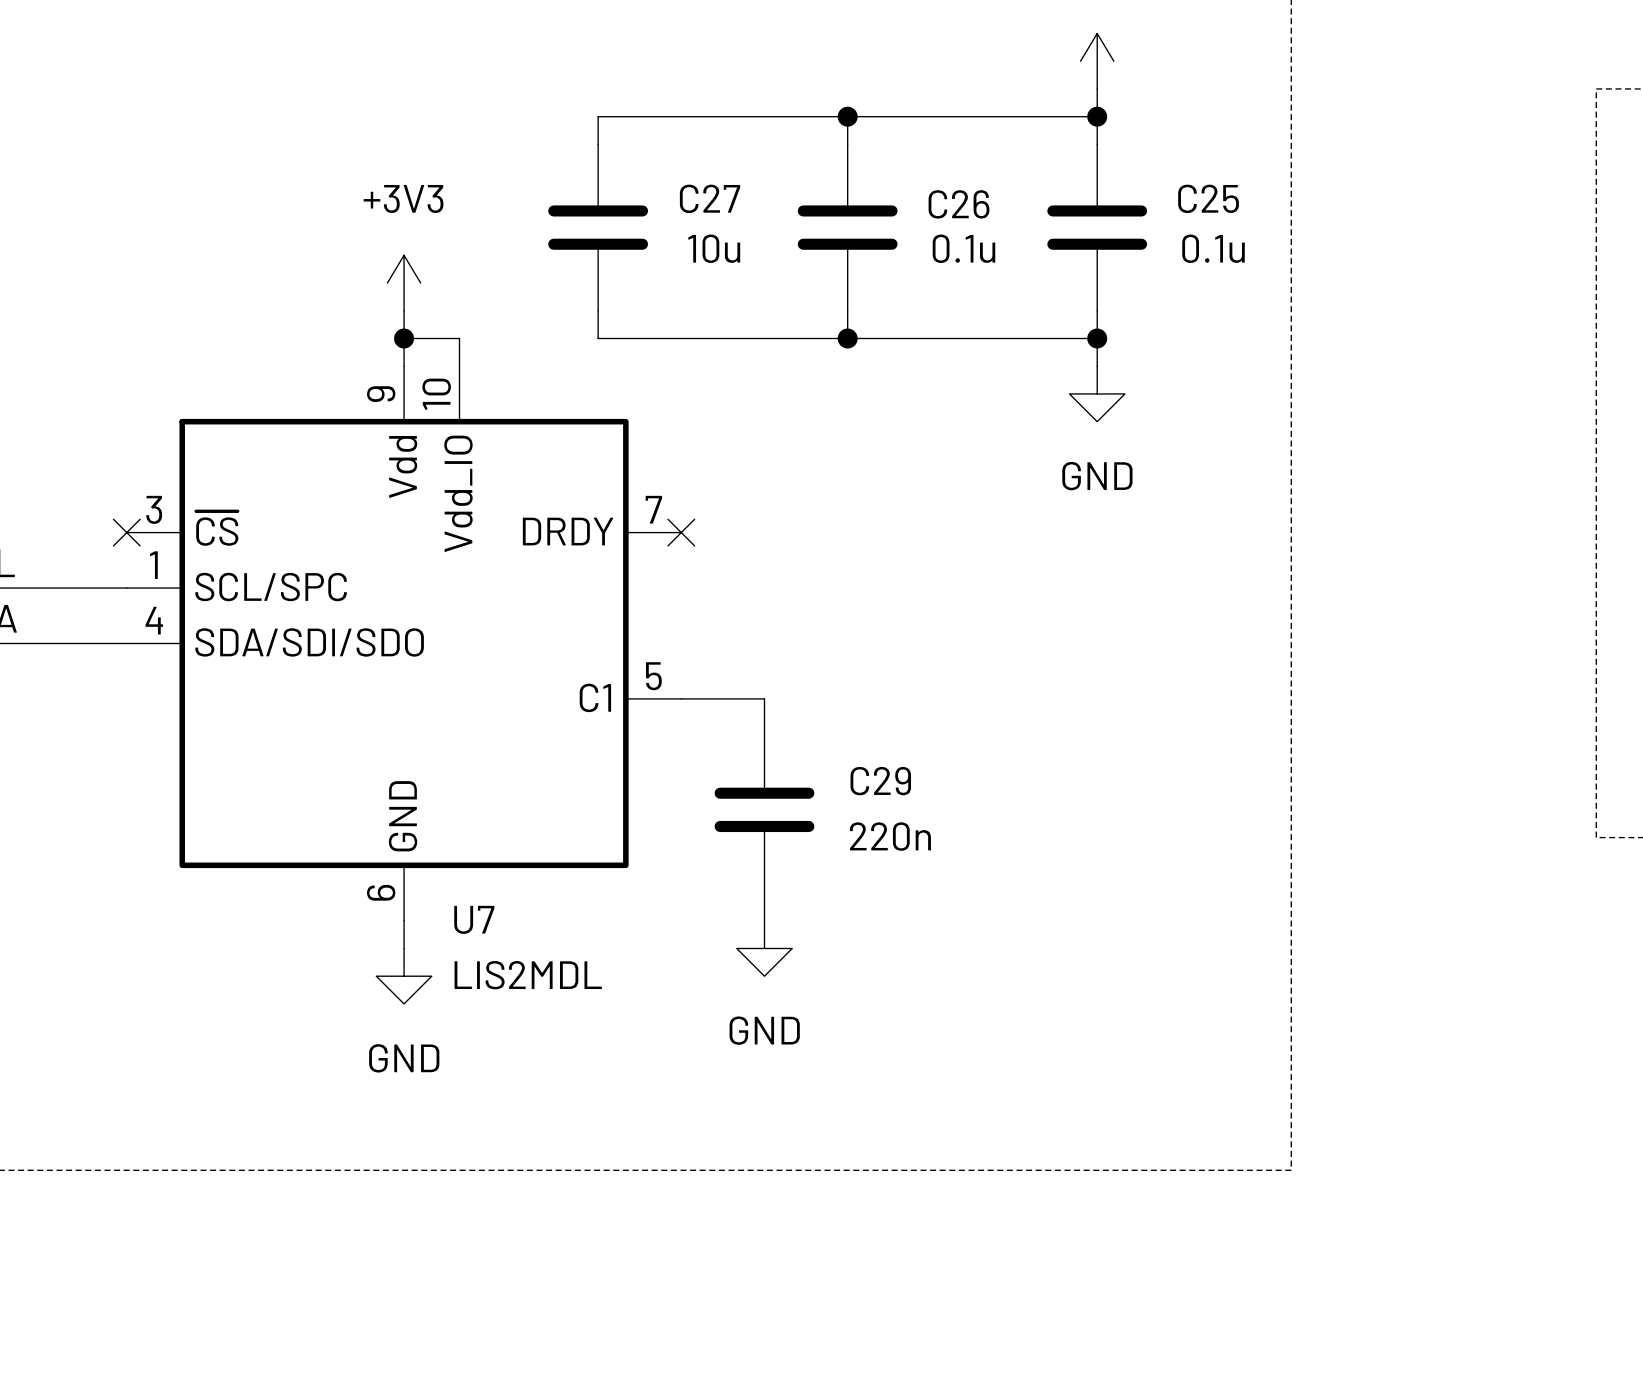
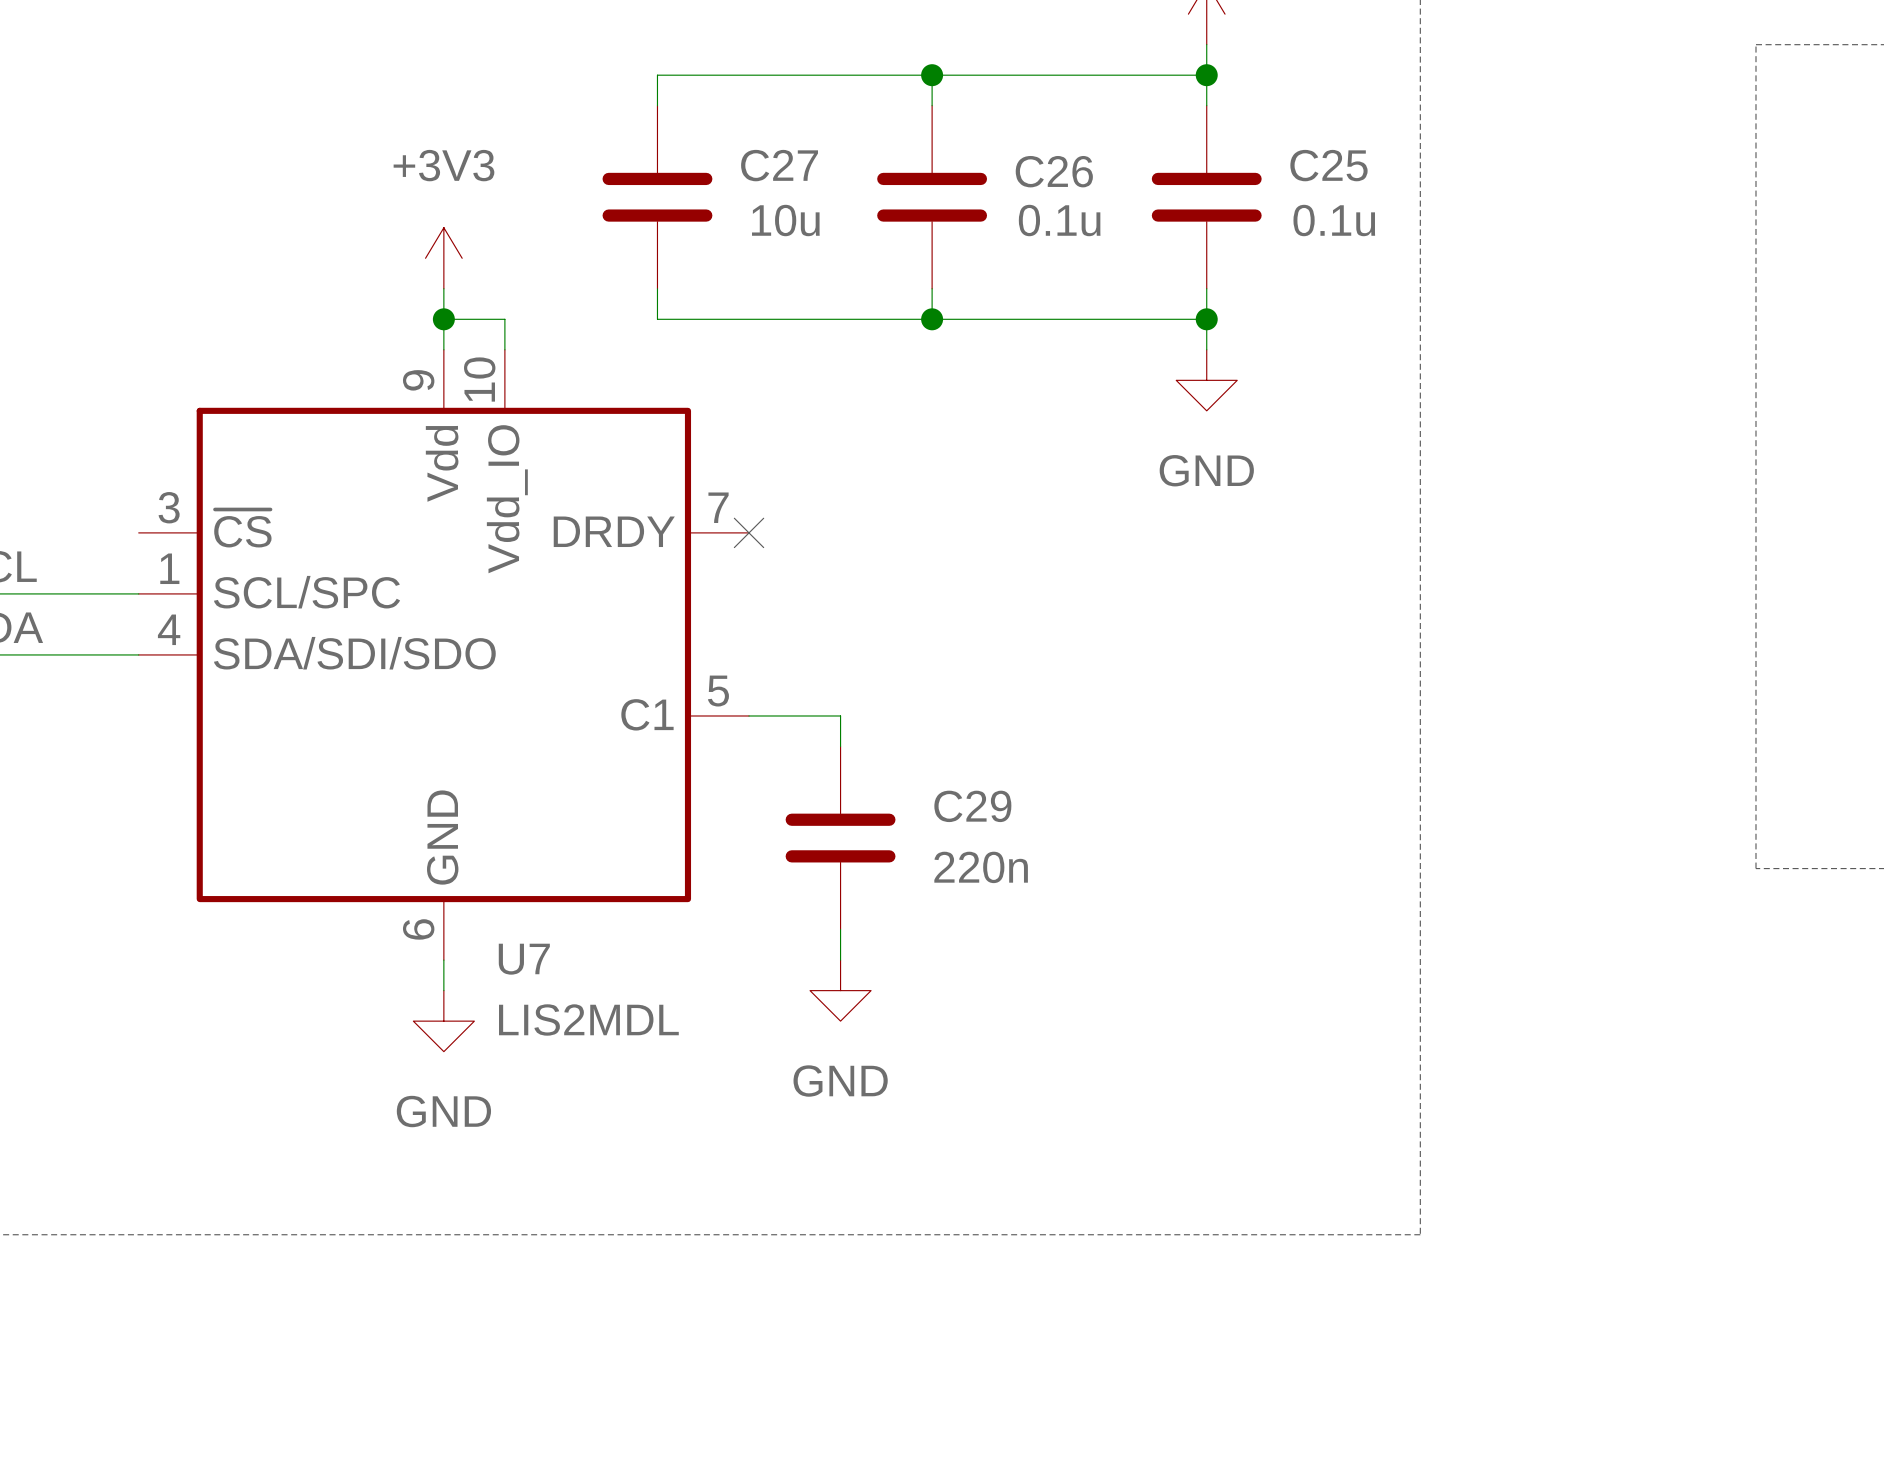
no-connect mark: (126, 532) -> none

